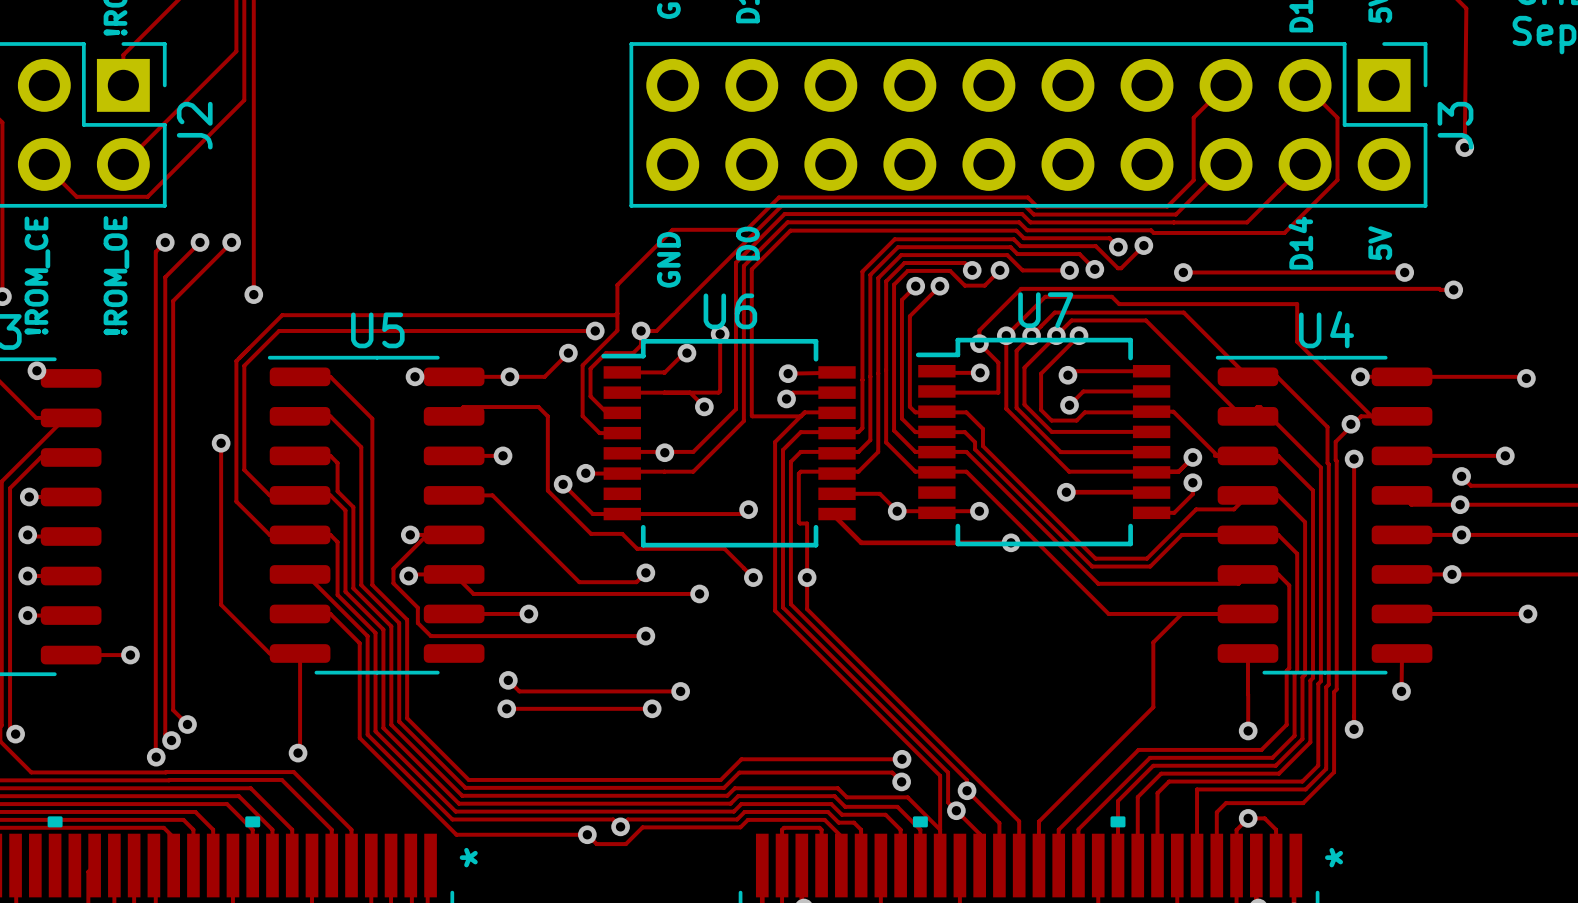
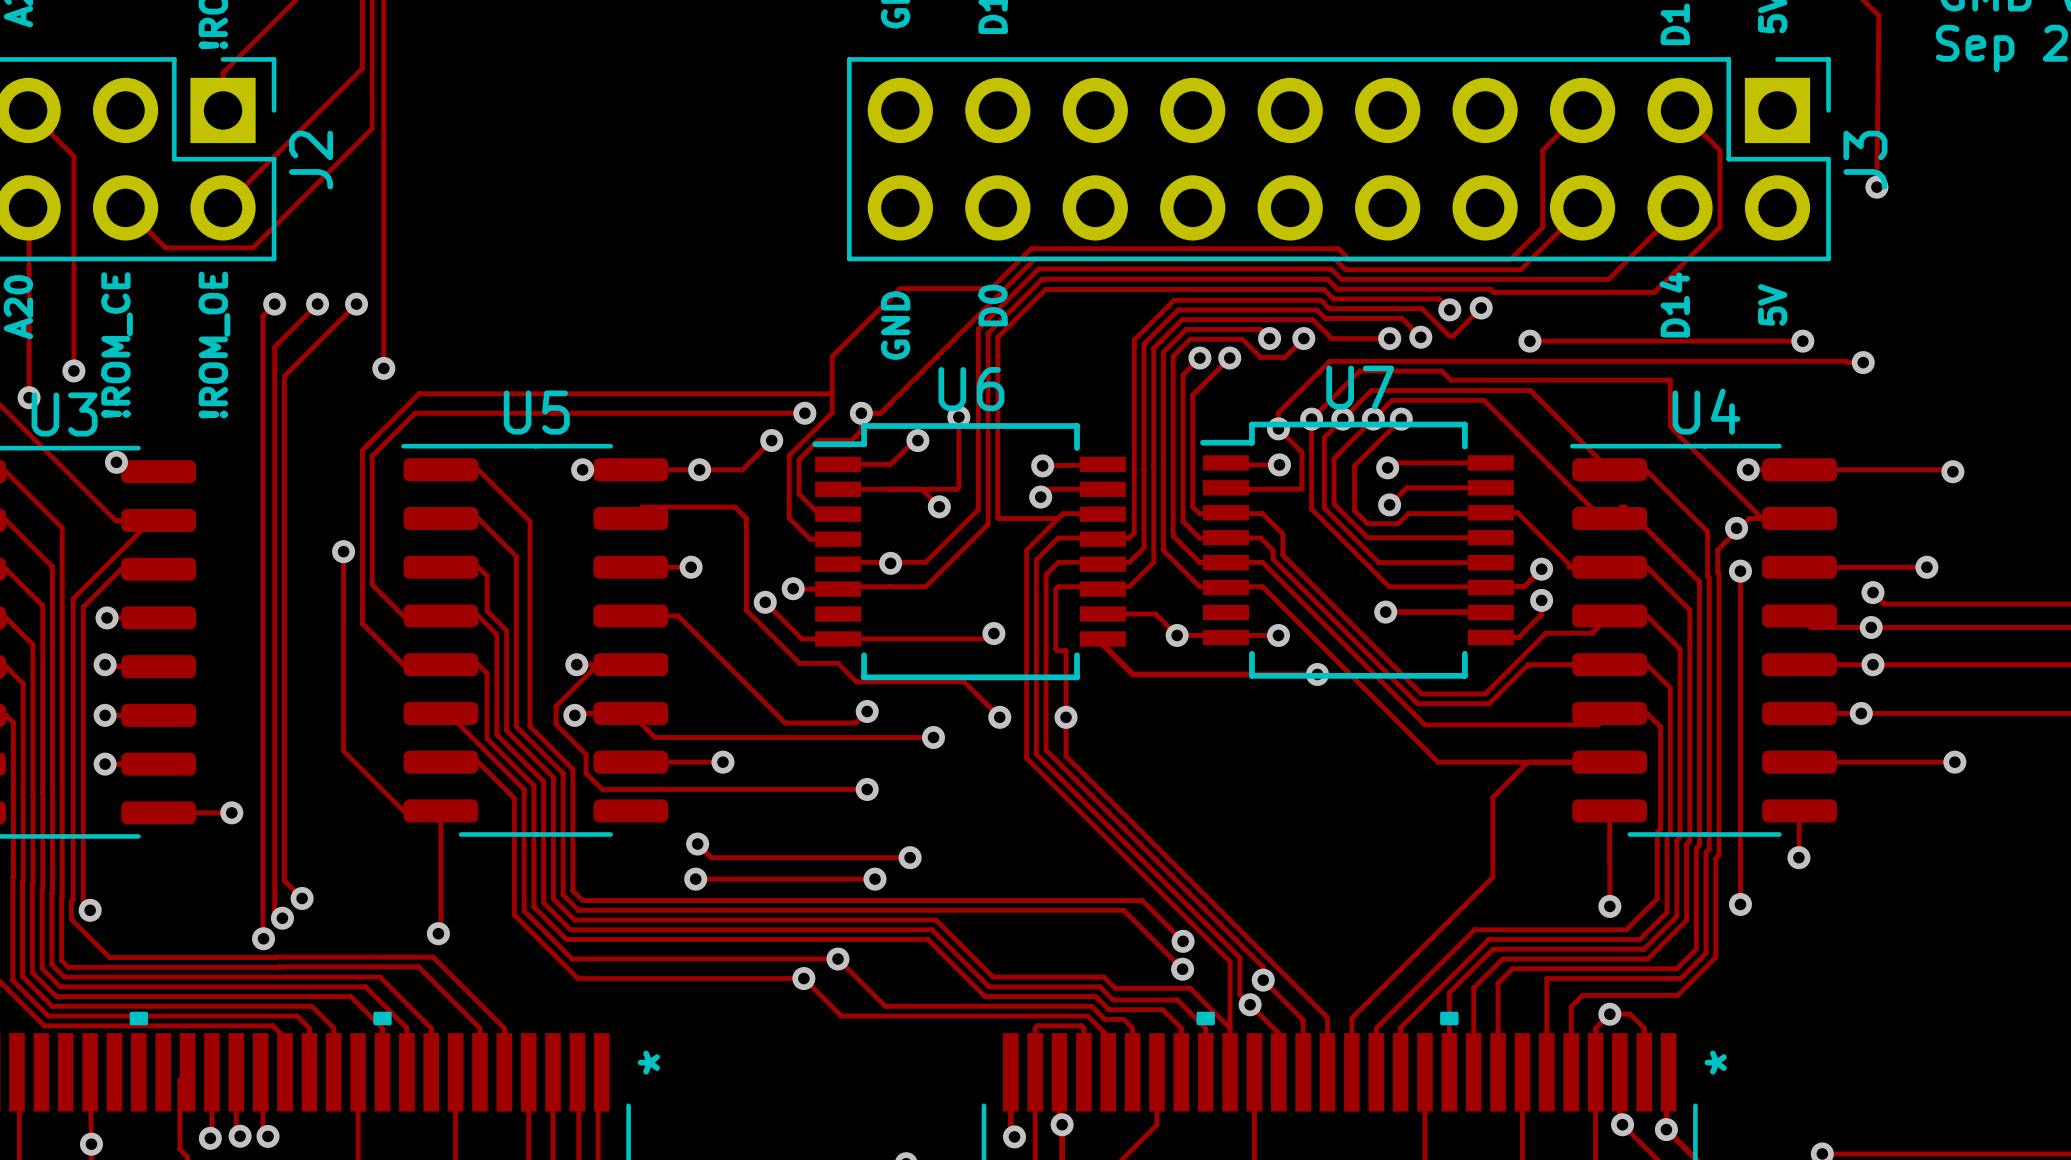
track: (415, 726) (468, 779) (720, 779) (741, 759) (902, 759) -> (582, 900) (1142, 900) (1183, 941)
track: (411, 734) (465, 787) (724, 787) (739, 772) (892, 772) -> (578, 910) (1123, 910) (1171, 957)
track: (408, 742) (462, 795) (727, 795) (734, 788) (747, 788) -> (574, 920) (936, 920) (993, 977)
track: (405, 749) (458, 803) (730, 803) (738, 796) (744, 796) -> (570, 929) (932, 929) (989, 986)
track: (401, 757) (455, 811) (733, 811) (741, 804) -> (566, 939) (928, 939) (985, 996)
track: (406, 773) (452, 819) (613, 819) (620, 826) (627, 819) (737, 819) (744, 811) -> (572, 959) (837, 959) (885, 1006) (989, 1006)
via: none -> (837, 959)
track: (411, 789) (456, 834) (587, 834) (596, 844) (625, 844) (642, 827) (740, 827) (747, 819) -> (577, 978) (803, 978) (841, 1016) (993, 1016)
via: none -> (803, 978)
via: (620, 826) -> none
via: (587, 834) -> none

